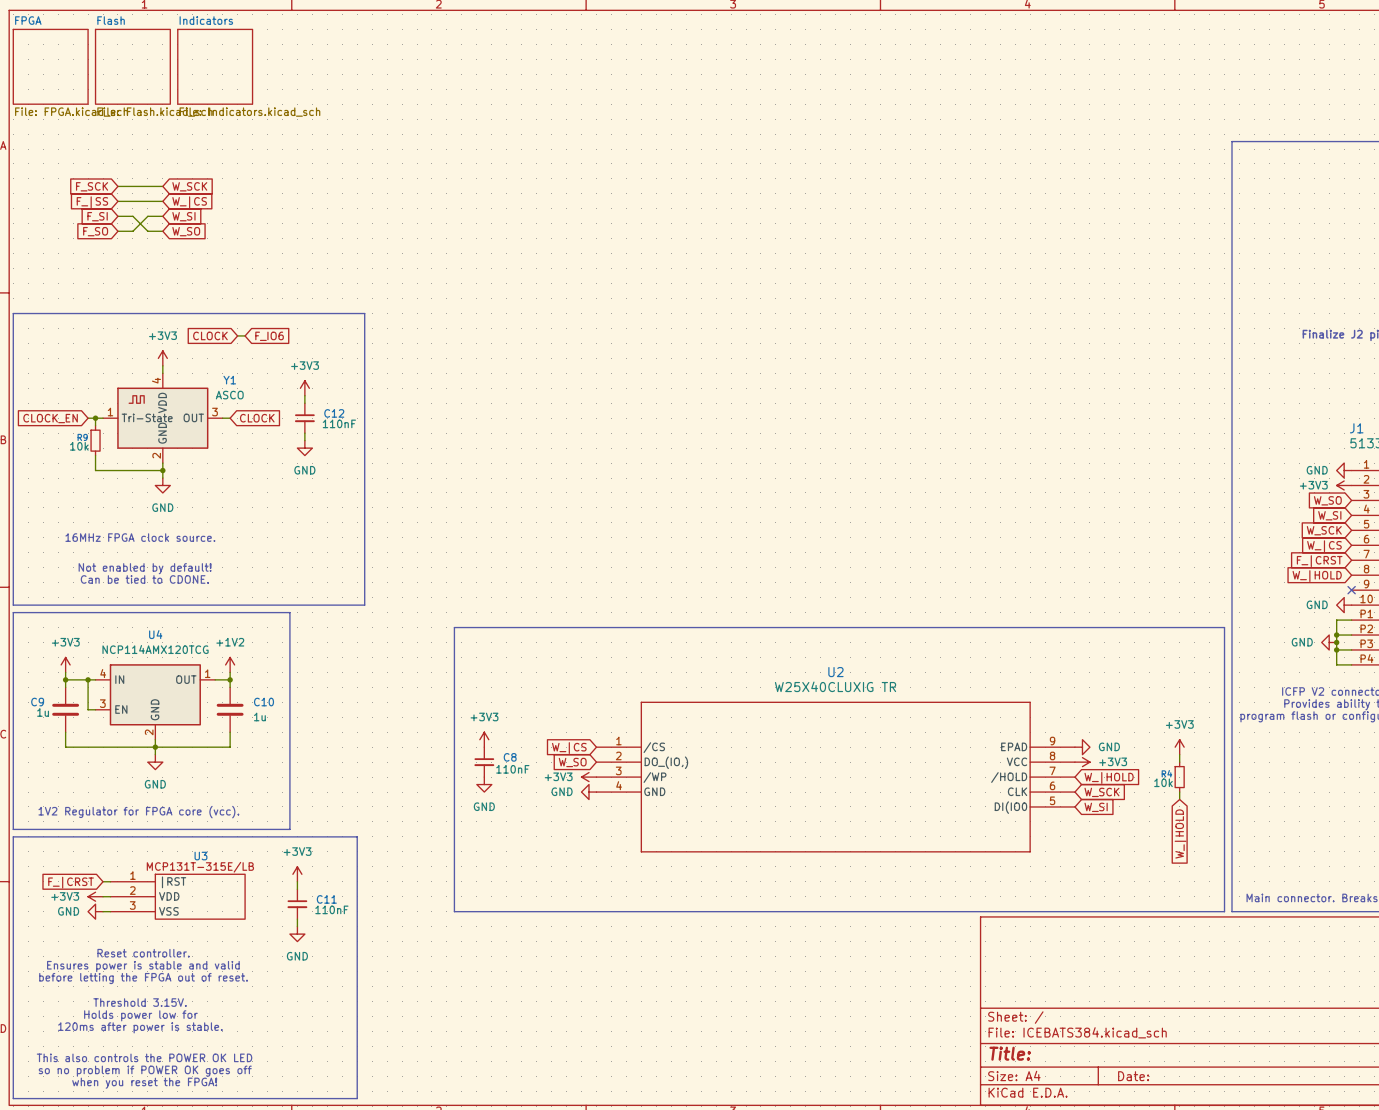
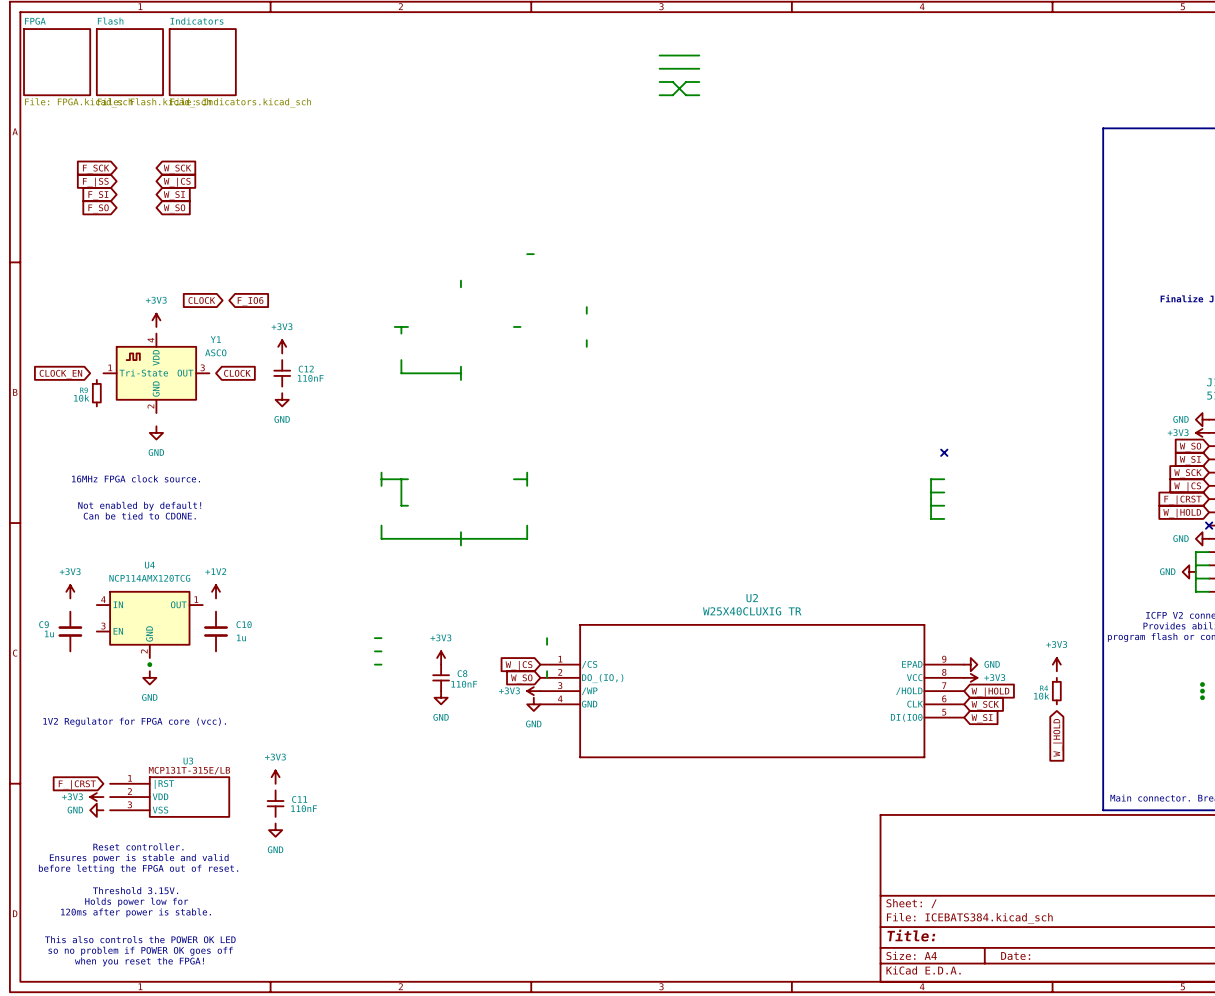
wire: none -> (659, 55) (699, 55)
wire: none -> (659, 68) (699, 68)
wire: none -> (659, 82) (672, 82) (686, 95) (699, 95)
wire: none -> (699, 82) (686, 82) (672, 95) (659, 95)
wire: (117, 186) (162, 186) -> none
wire: (117, 201) (162, 201) -> none
wire: (117, 216) (132, 216) (147, 231) (162, 231) -> none
wire: (162, 216) (147, 216) (132, 231) (117, 231) -> none
wire: none -> (527, 254) (533, 254)
line: (13, 313) (364, 313) (364, 605) (13, 605) (13, 313) -> none
wire: none -> (460, 280) (460, 287)
wire: (237, 335) (245, 335) -> none
wire: none -> (586, 307) (586, 313)
wire: (162, 365) (162, 373) -> none
wire: none -> (394, 326) (408, 326)
wire: none -> (513, 326) (520, 326)
wire: none -> (586, 340) (586, 346)
wire: (304, 395) (304, 403) -> (401, 326) (401, 333)
wire: none -> (401, 360) (401, 373) (460, 373)
wire: none -> (460, 366) (460, 379)
wire: (88, 418) (103, 418) -> none
wire: (95, 418) (95, 425) -> none
junction: (95, 418) -> none
wire: (222, 418) (230, 418) -> none
wire: (304, 433) (304, 440) -> none
wire: (95, 455) (95, 470) (162, 470) -> none
wire: (162, 463) (162, 478) -> none
junction: (162, 470) -> none
no-connect mark: none -> (944, 452)
wire: none -> (381, 472) (381, 485)
wire: none -> (527, 472) (527, 485)
wire: none -> (381, 479) (408, 479)
wire: none -> (401, 479) (401, 505) (408, 505)
wire: none -> (513, 479) (527, 479)
wire: none -> (944, 479) (931, 479) (931, 518) (944, 518)
wire: none -> (931, 492) (944, 492)
wire: none -> (931, 505) (944, 505)
wire: none -> (381, 525) (381, 538) (527, 538) (527, 525)
wire: none -> (460, 532) (460, 545)
line: (13, 612) (13, 829) (289, 829) (289, 612) (13, 612) -> none
line: (454, 627) (1224, 627) (1224, 911) (454, 911) (454, 627) -> none
junction: (1336, 635) -> none
junction: (1336, 642) -> none
junction: (1336, 649) -> none
wire: (65, 672) (65, 687) -> none
wire: (230, 672) (230, 687) -> none
wire: (65, 679) (95, 679) -> none
junction: (65, 679) -> none
wire: (88, 679) (88, 709) (95, 709) -> none
junction: (88, 679) -> none
wire: (215, 679) (230, 679) -> none
junction: (230, 679) -> none
wire: none -> (374, 638) (381, 638)
wire: none -> (547, 638) (547, 644)
wire: (65, 732) (65, 747) (230, 747) (230, 732) -> none
wire: none -> (374, 651) (381, 651)
wire: (155, 739) (155, 754) -> none
wire: none -> (374, 664) (381, 664)
wire: none -> (547, 671) (547, 677)
wire: (1179, 754) (1179, 762) -> none
junction: none -> (1202, 684)
junction: none -> (1202, 691)
junction: none -> (1202, 697)
power symbol rotation: 0° (589, 792) -> 90° counterclockwise (533, 704)
wire: (1179, 792) (1179, 799) -> none
line: (13, 836) (13, 1098) (357, 1098) (357, 836) (13, 836) -> none
wire: (103, 881) (110, 881) -> none
wire: (297, 881) (297, 889) -> none
wire: (103, 896) (110, 896) -> none
wire: (103, 911) (110, 911) -> none
wire: (297, 919) (297, 926) -> none

